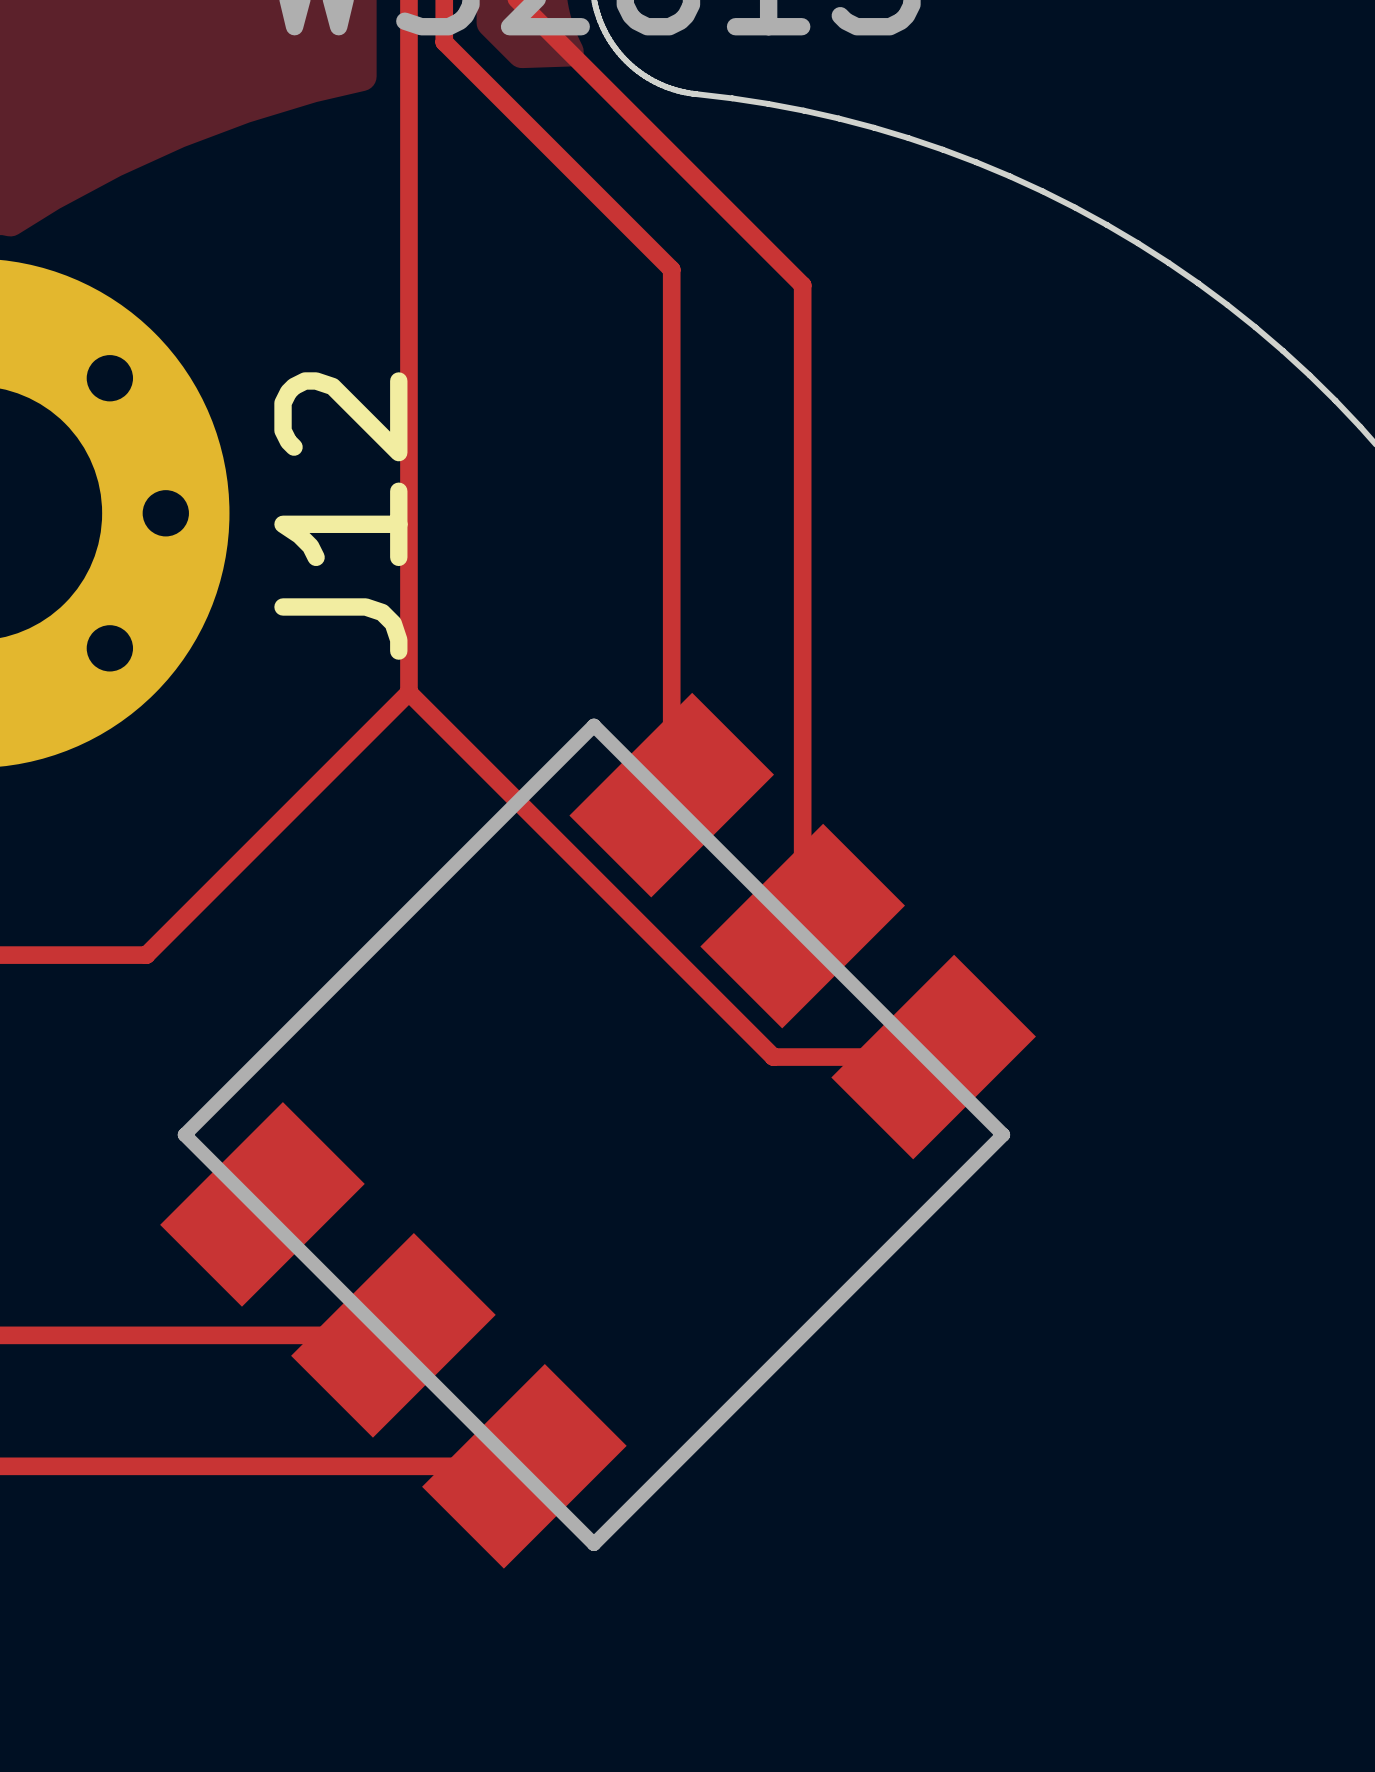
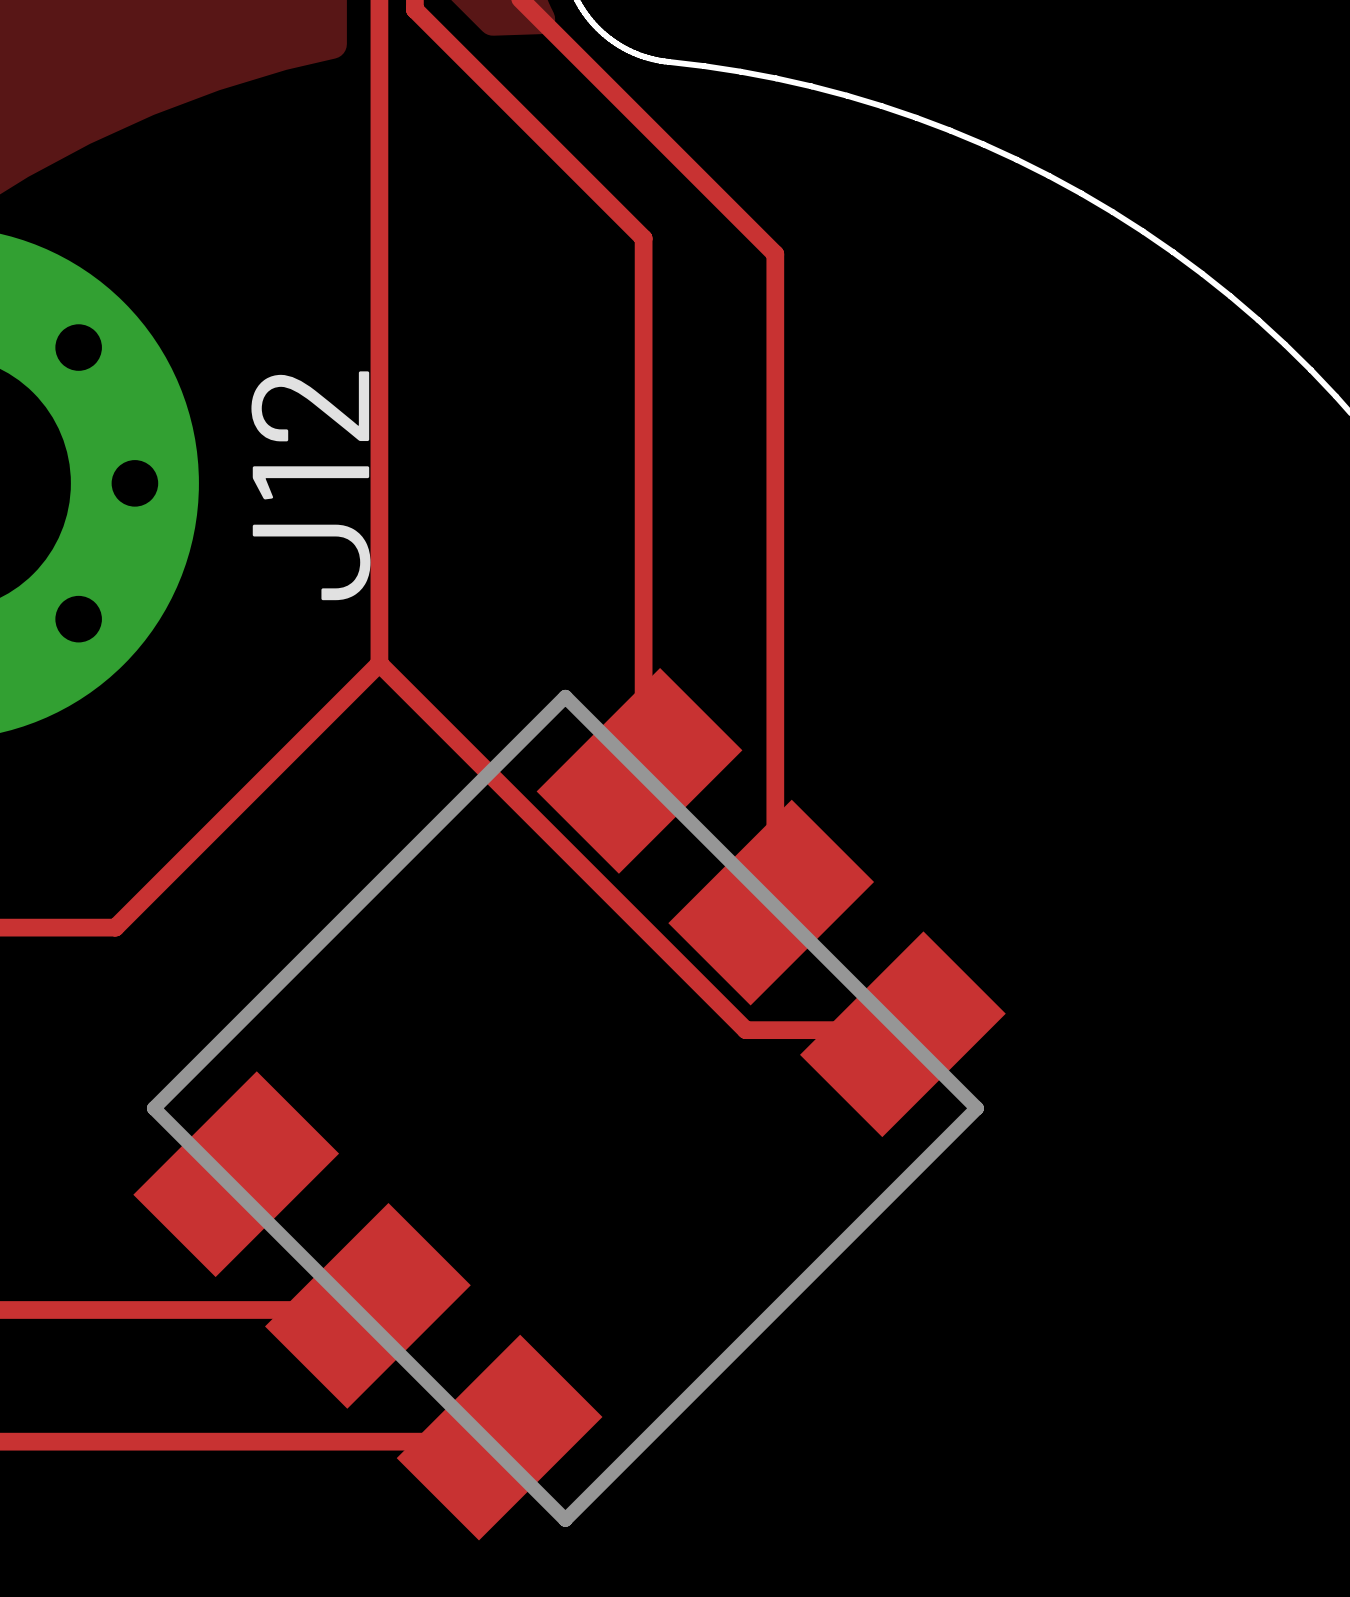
part footprint: [160, 692, 1036, 1569] -> [133, 668, 1006, 1541]

